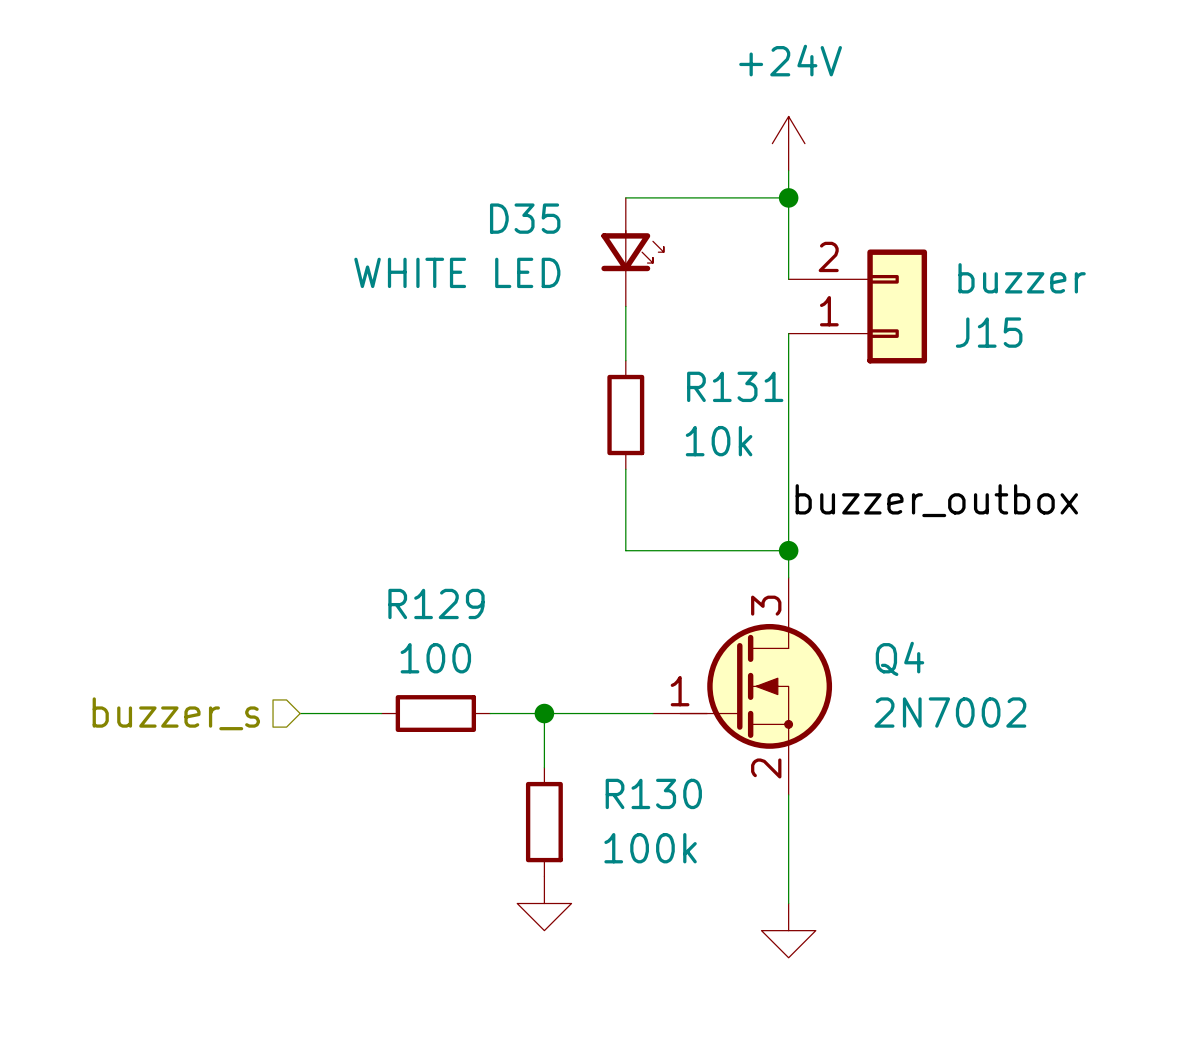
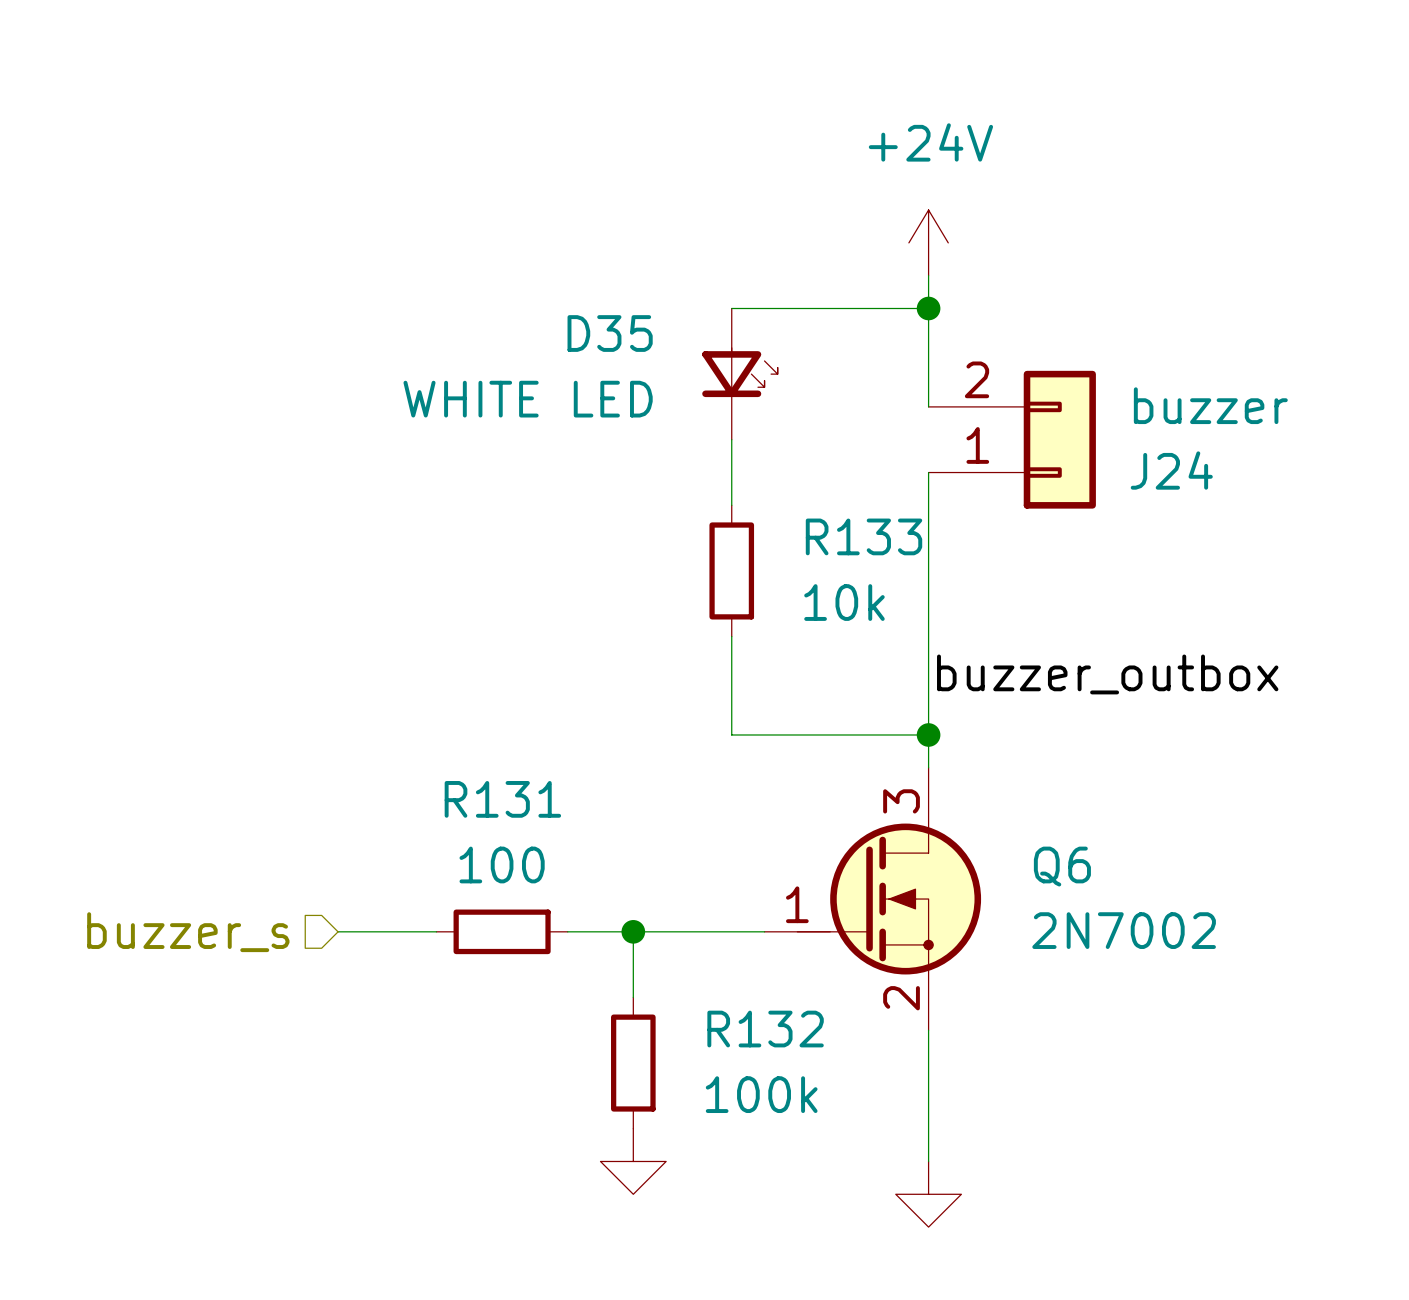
J15 name: J15 (989, 332) -> J24 (1171, 470)
R131 name: R131 (735, 386) -> R133 (864, 536)
R129 name: R129 (436, 603) -> R131 (502, 799)
Q4 name: Q4 (899, 658) -> Q6 (1062, 866)
R130 name: R130 (653, 793) -> R132 (765, 1029)

